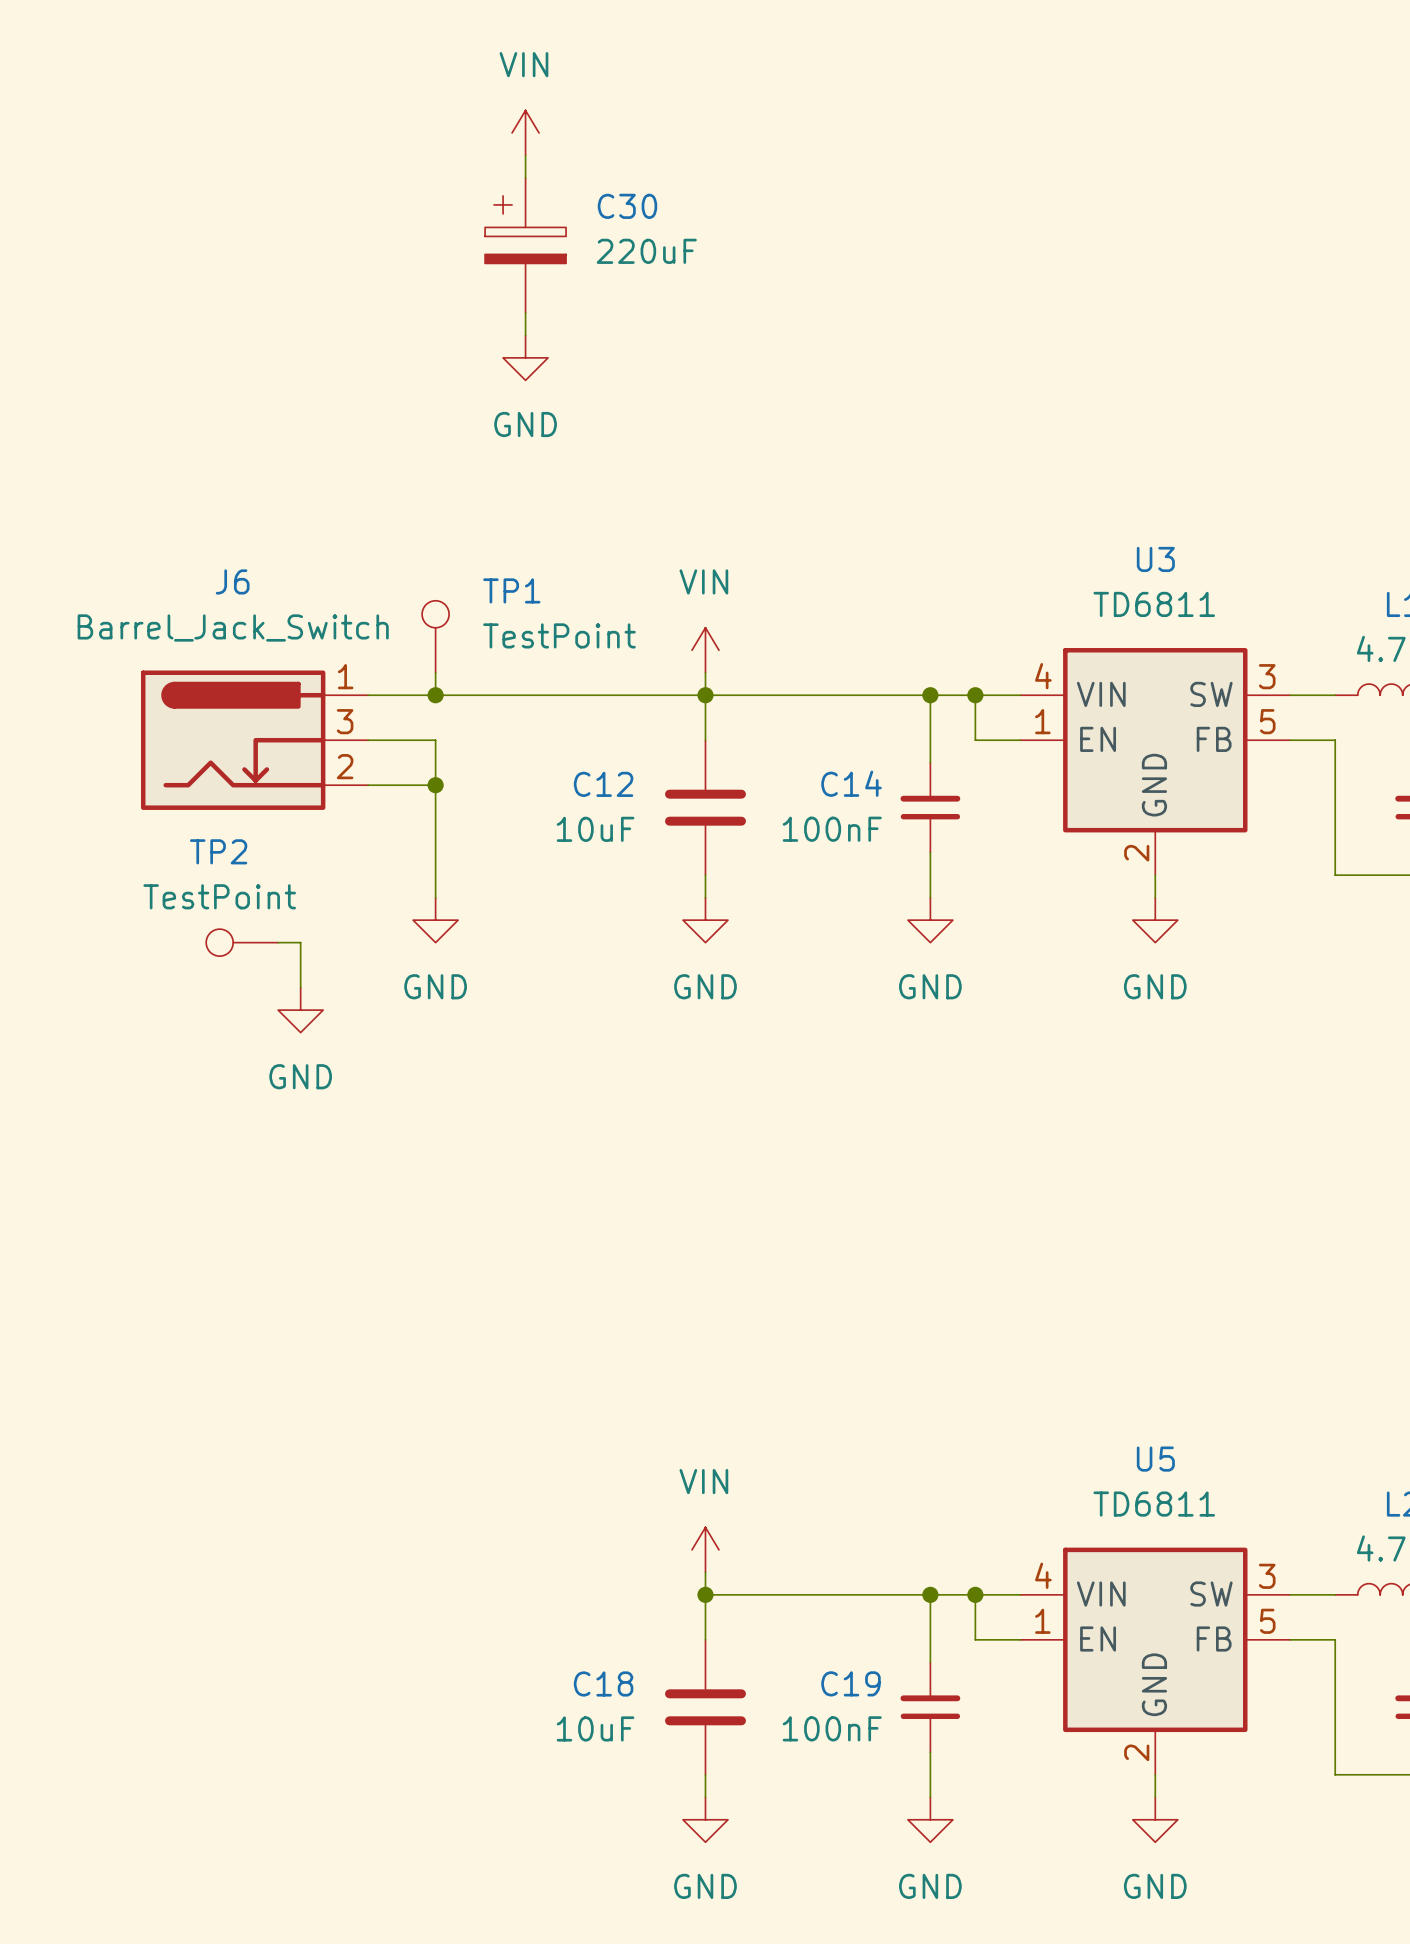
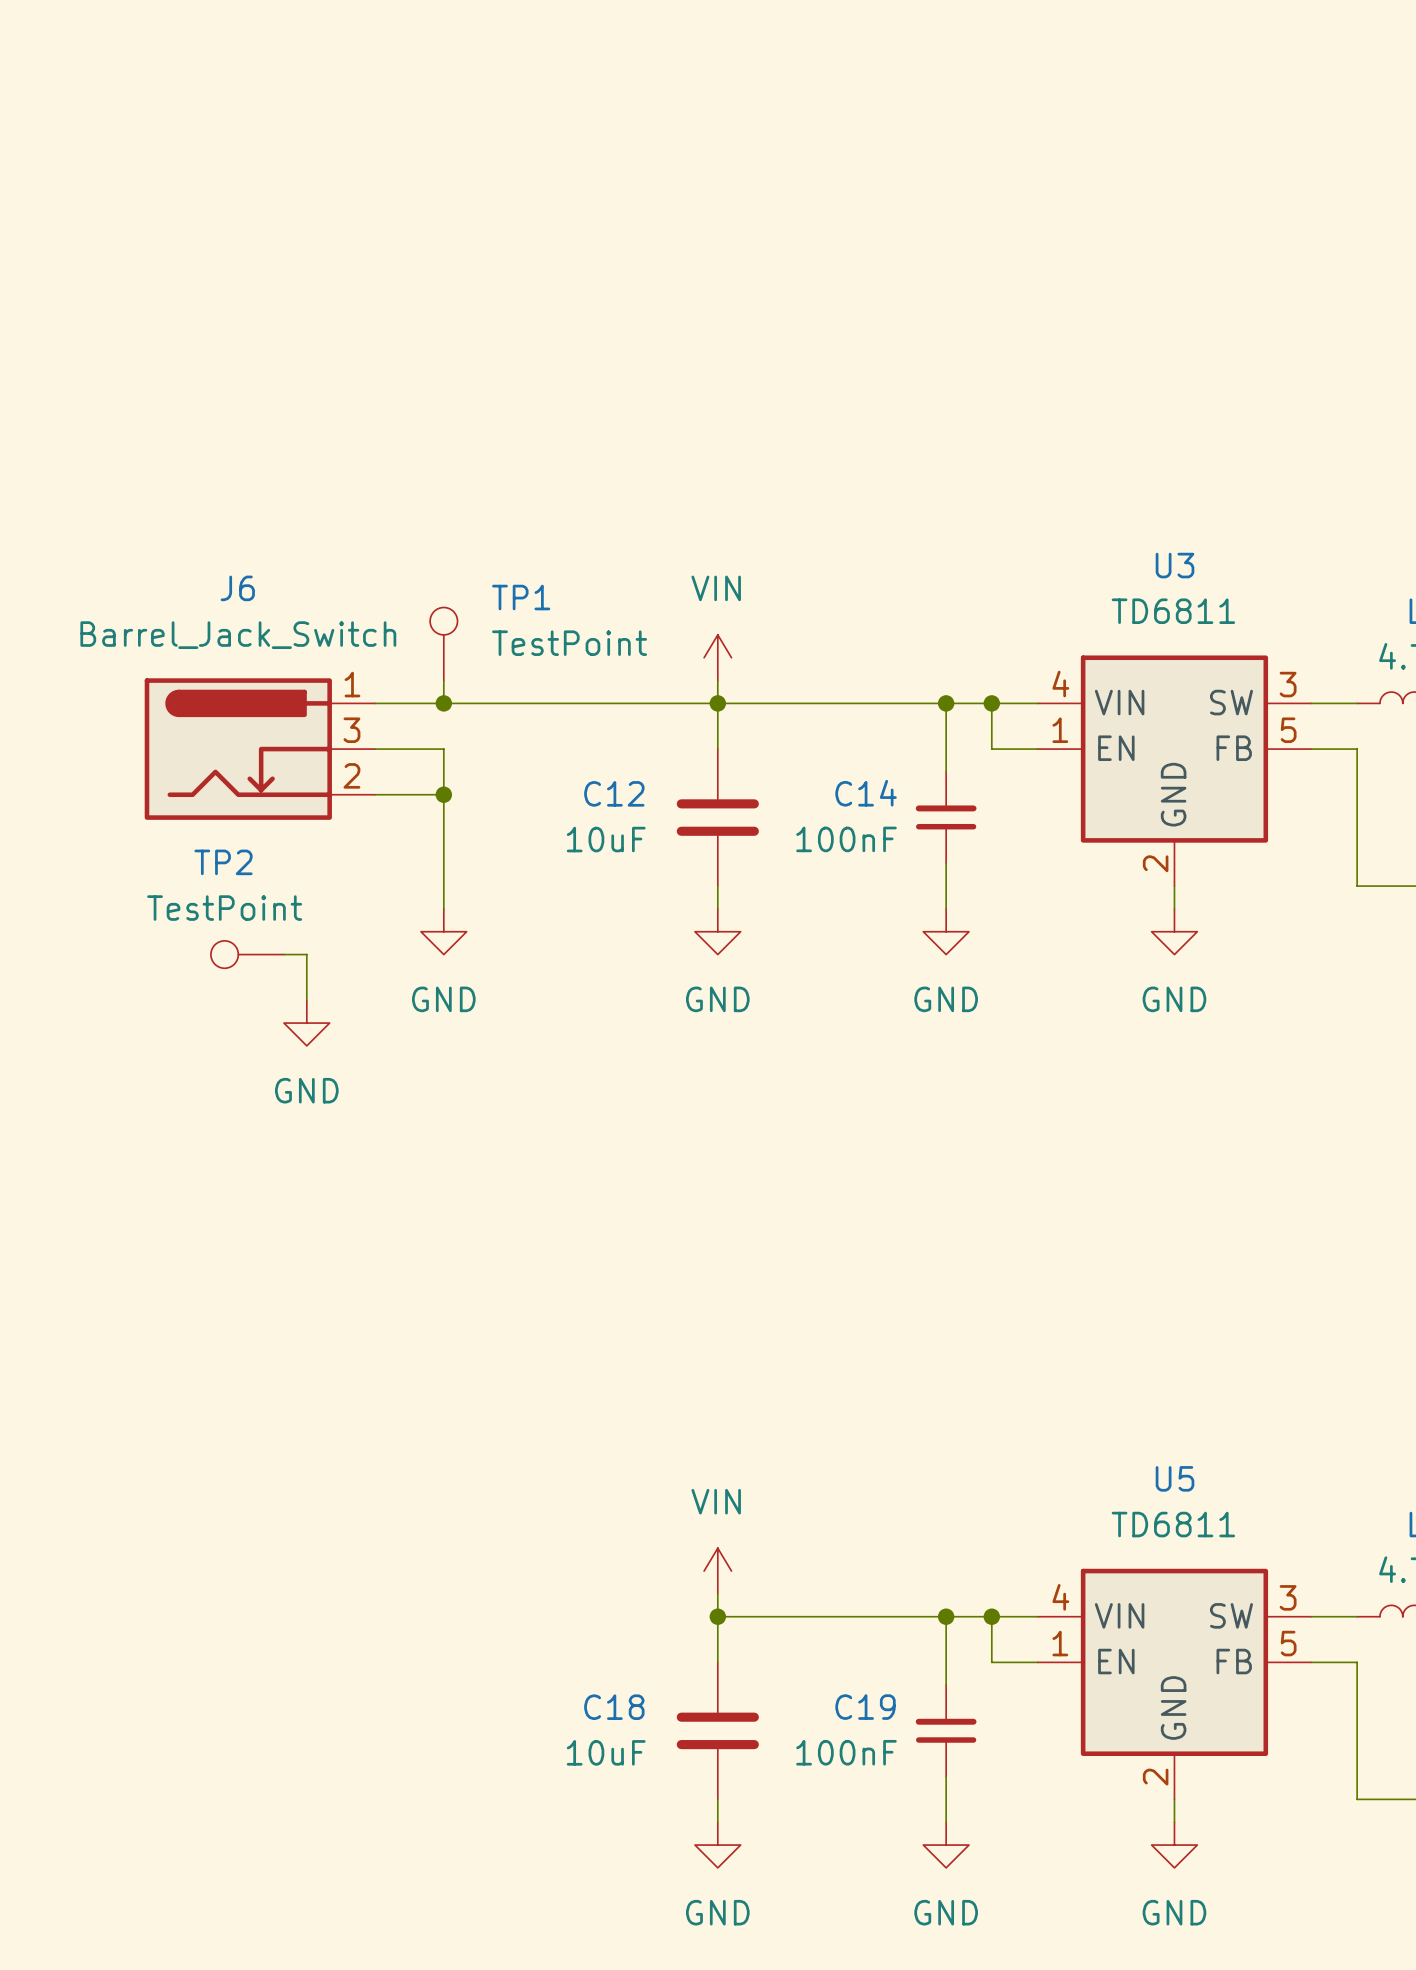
power symbol: VIN (525, 132) -> none
wire: (525, 155) (525, 177) -> none
C30: 220uF (525, 245) -> none
wire: (525, 312) (525, 335) -> none
power symbol: GND (525, 357) -> none

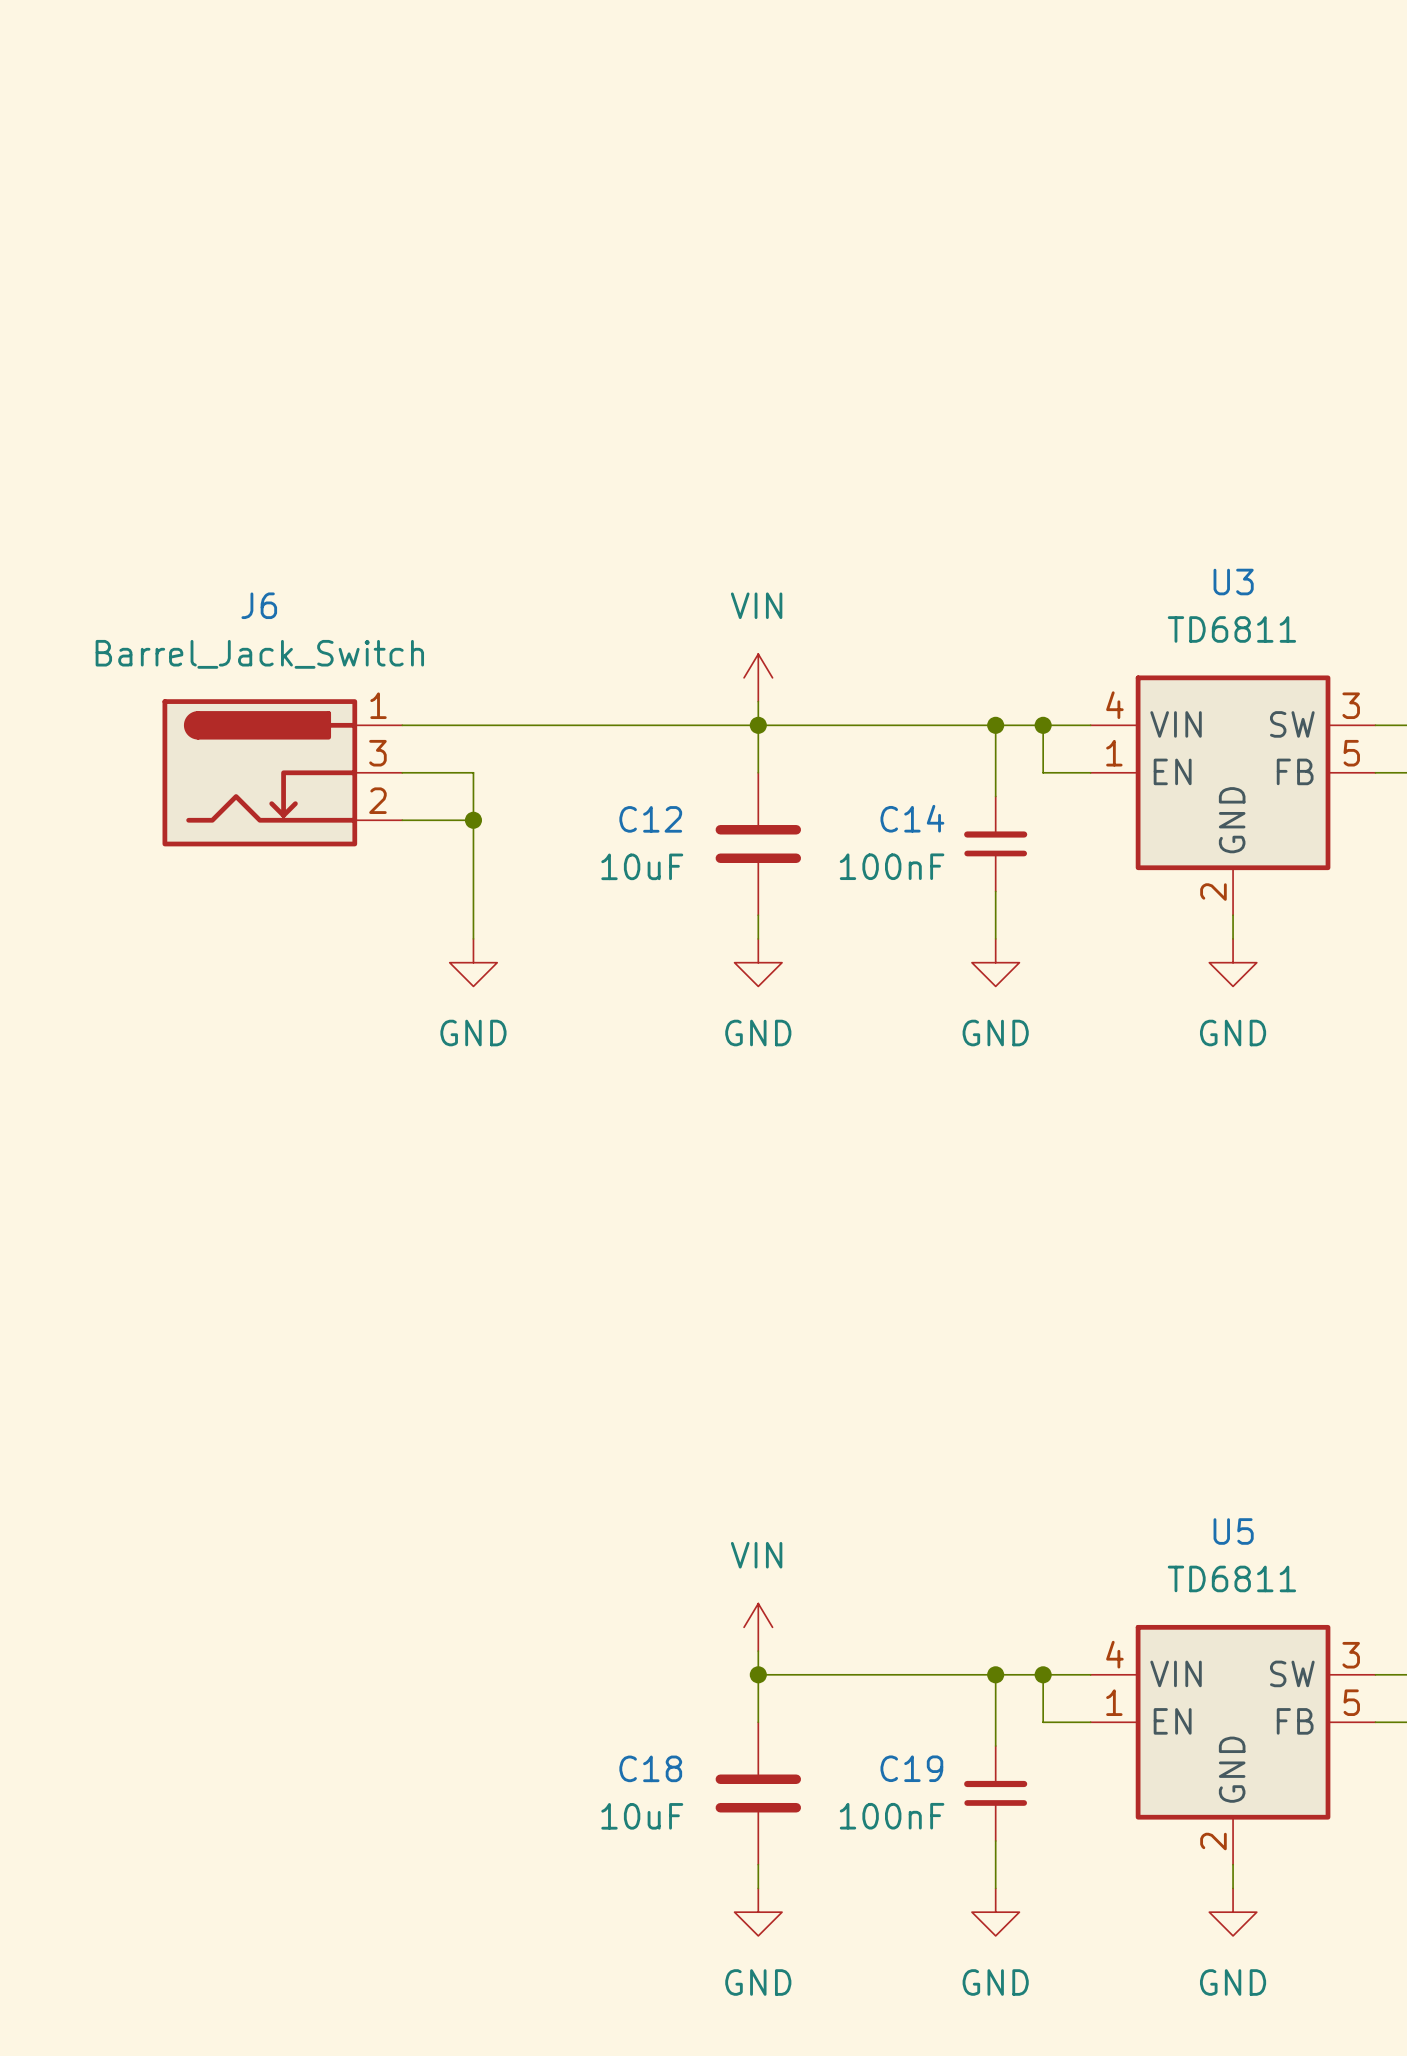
TP1: TestPoint (443, 644) -> none
wire: (443, 680) (443, 703) -> none
junction: (443, 703) -> none
TP2: TestPoint (247, 954) -> none
wire: (283, 954) (306, 954) (306, 1000) -> none
power symbol: GND (306, 1023) -> none

